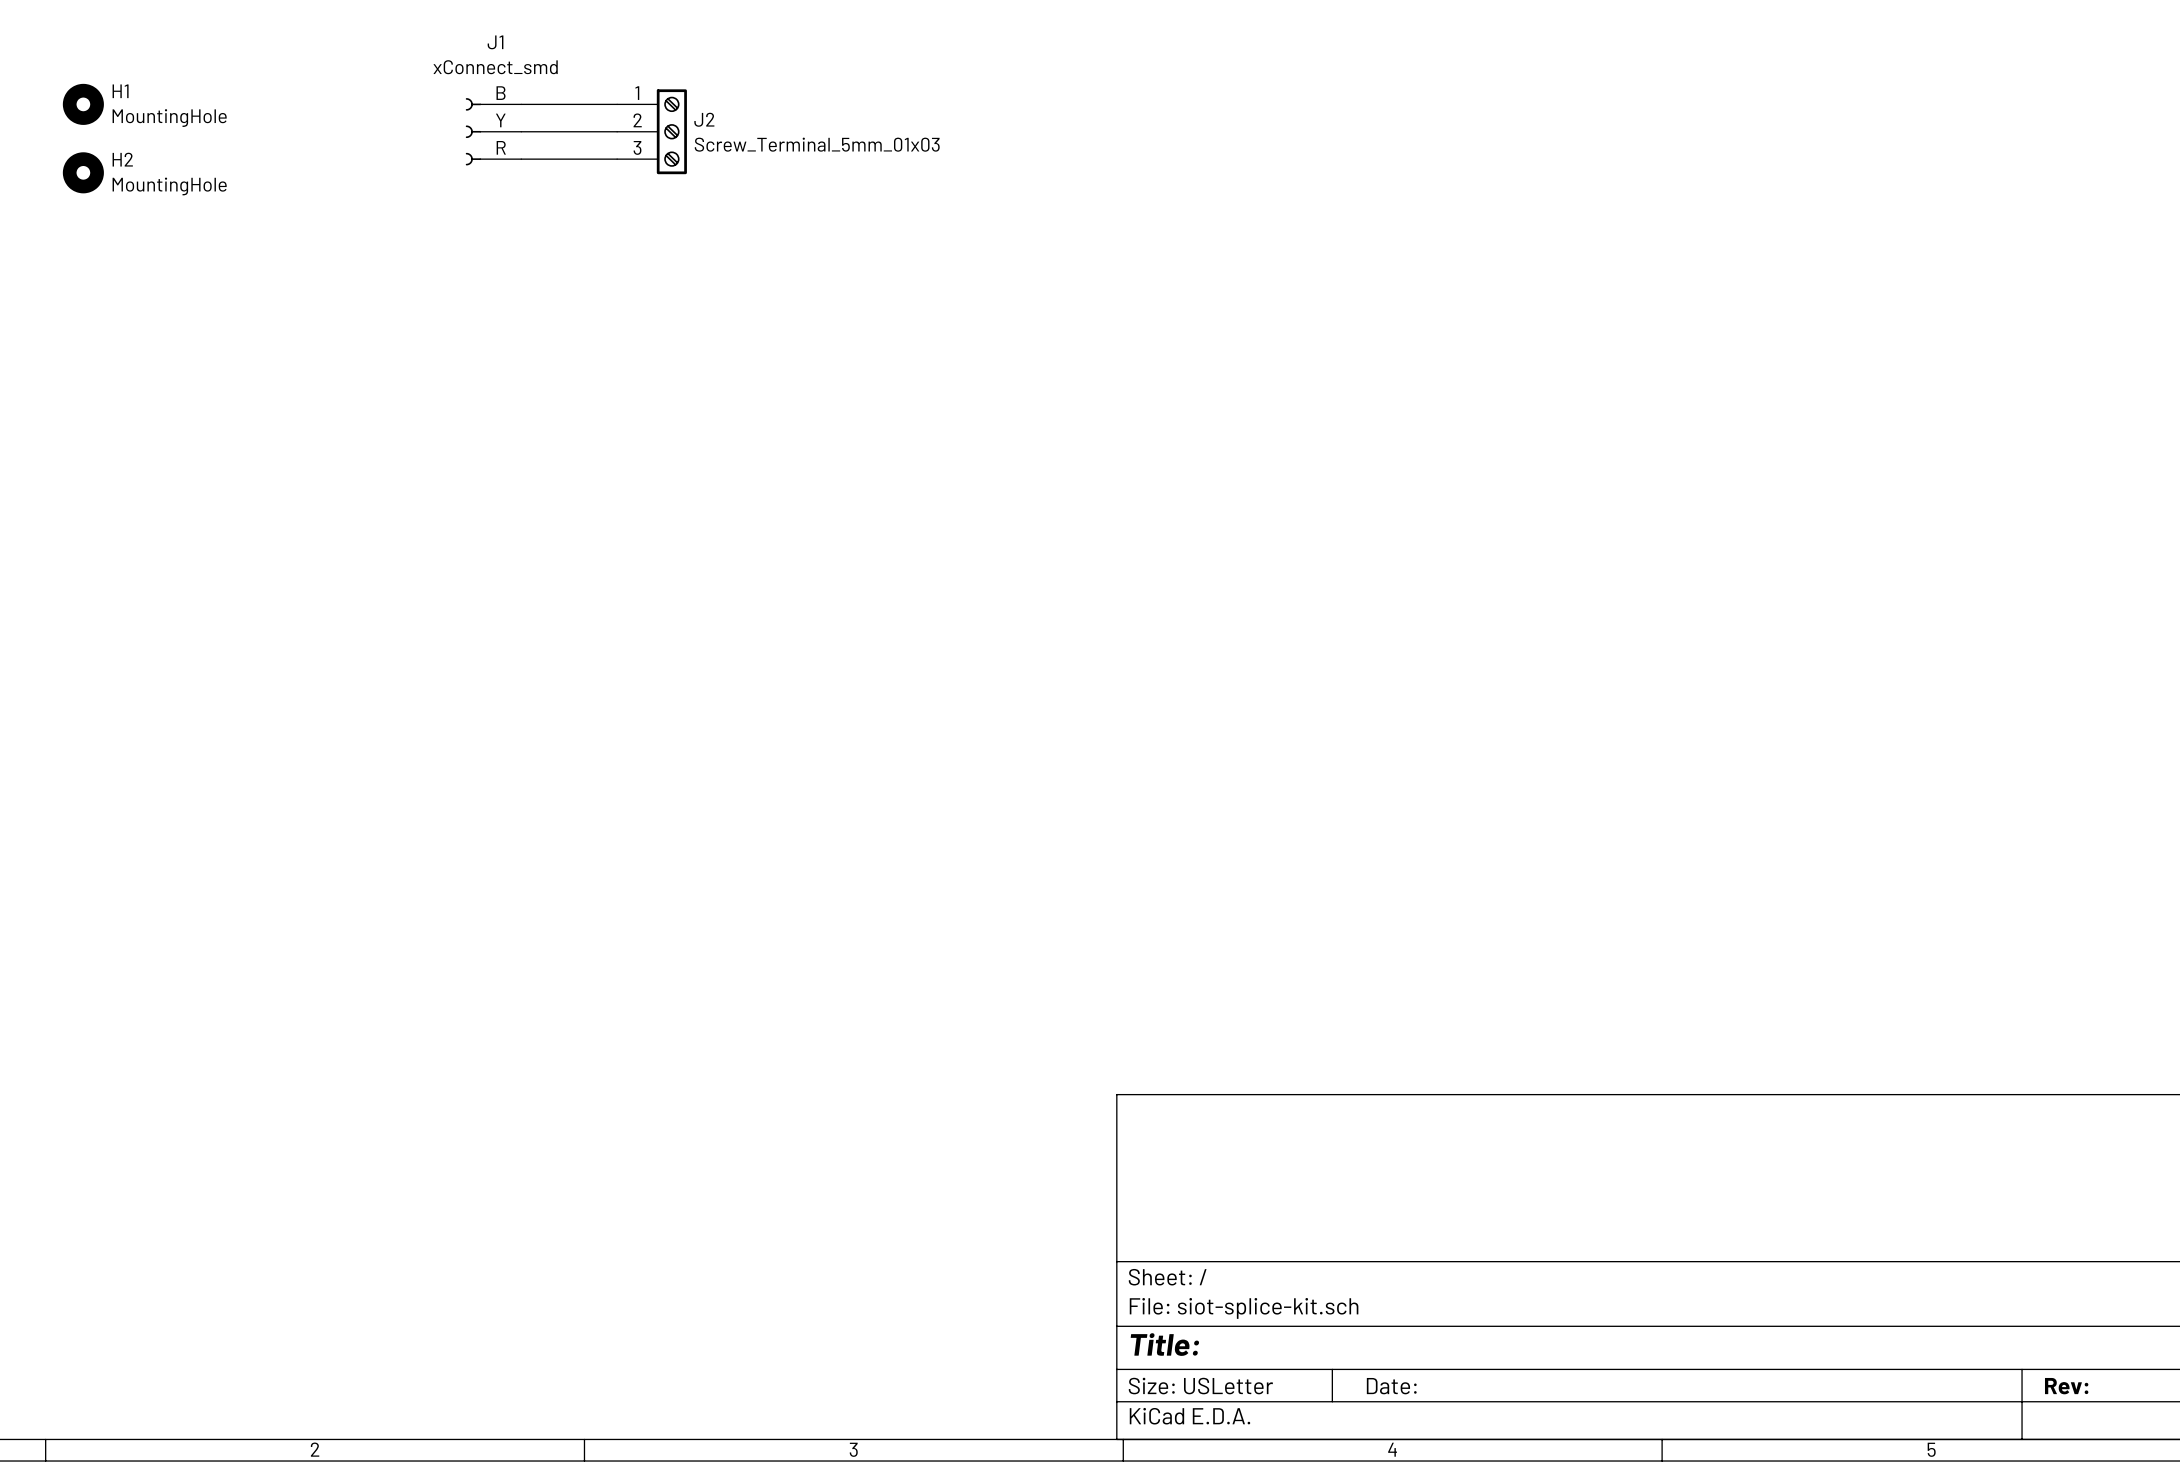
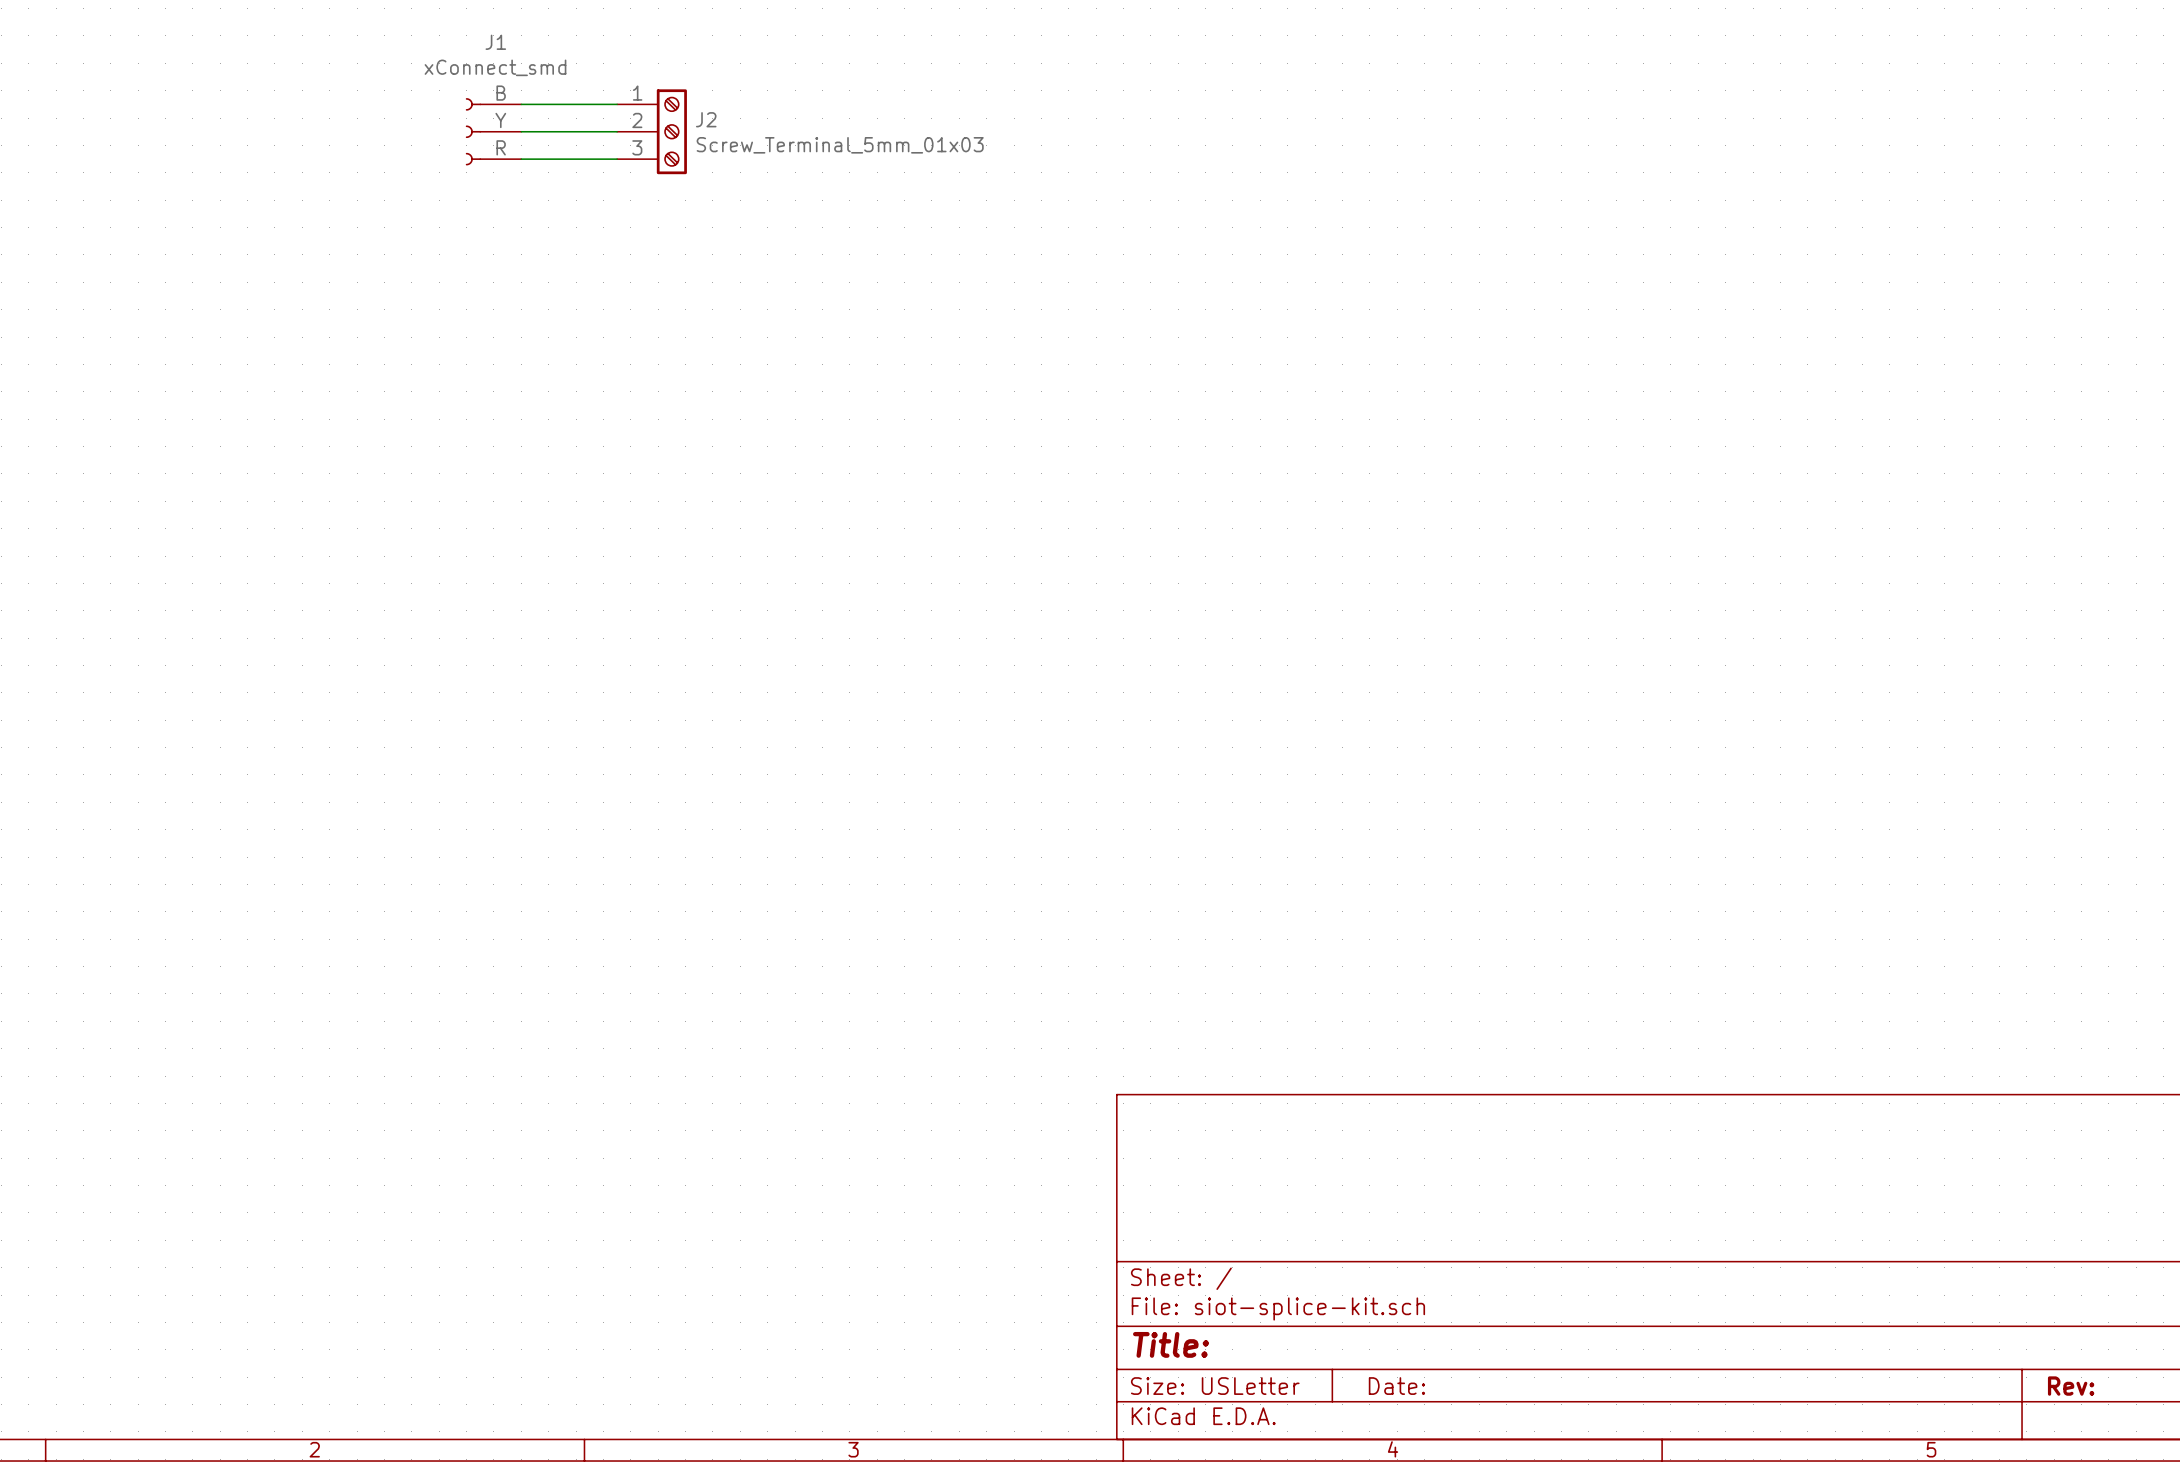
H1: MountingHole (83, 104) -> none
H2: MountingHole (83, 172) -> none

